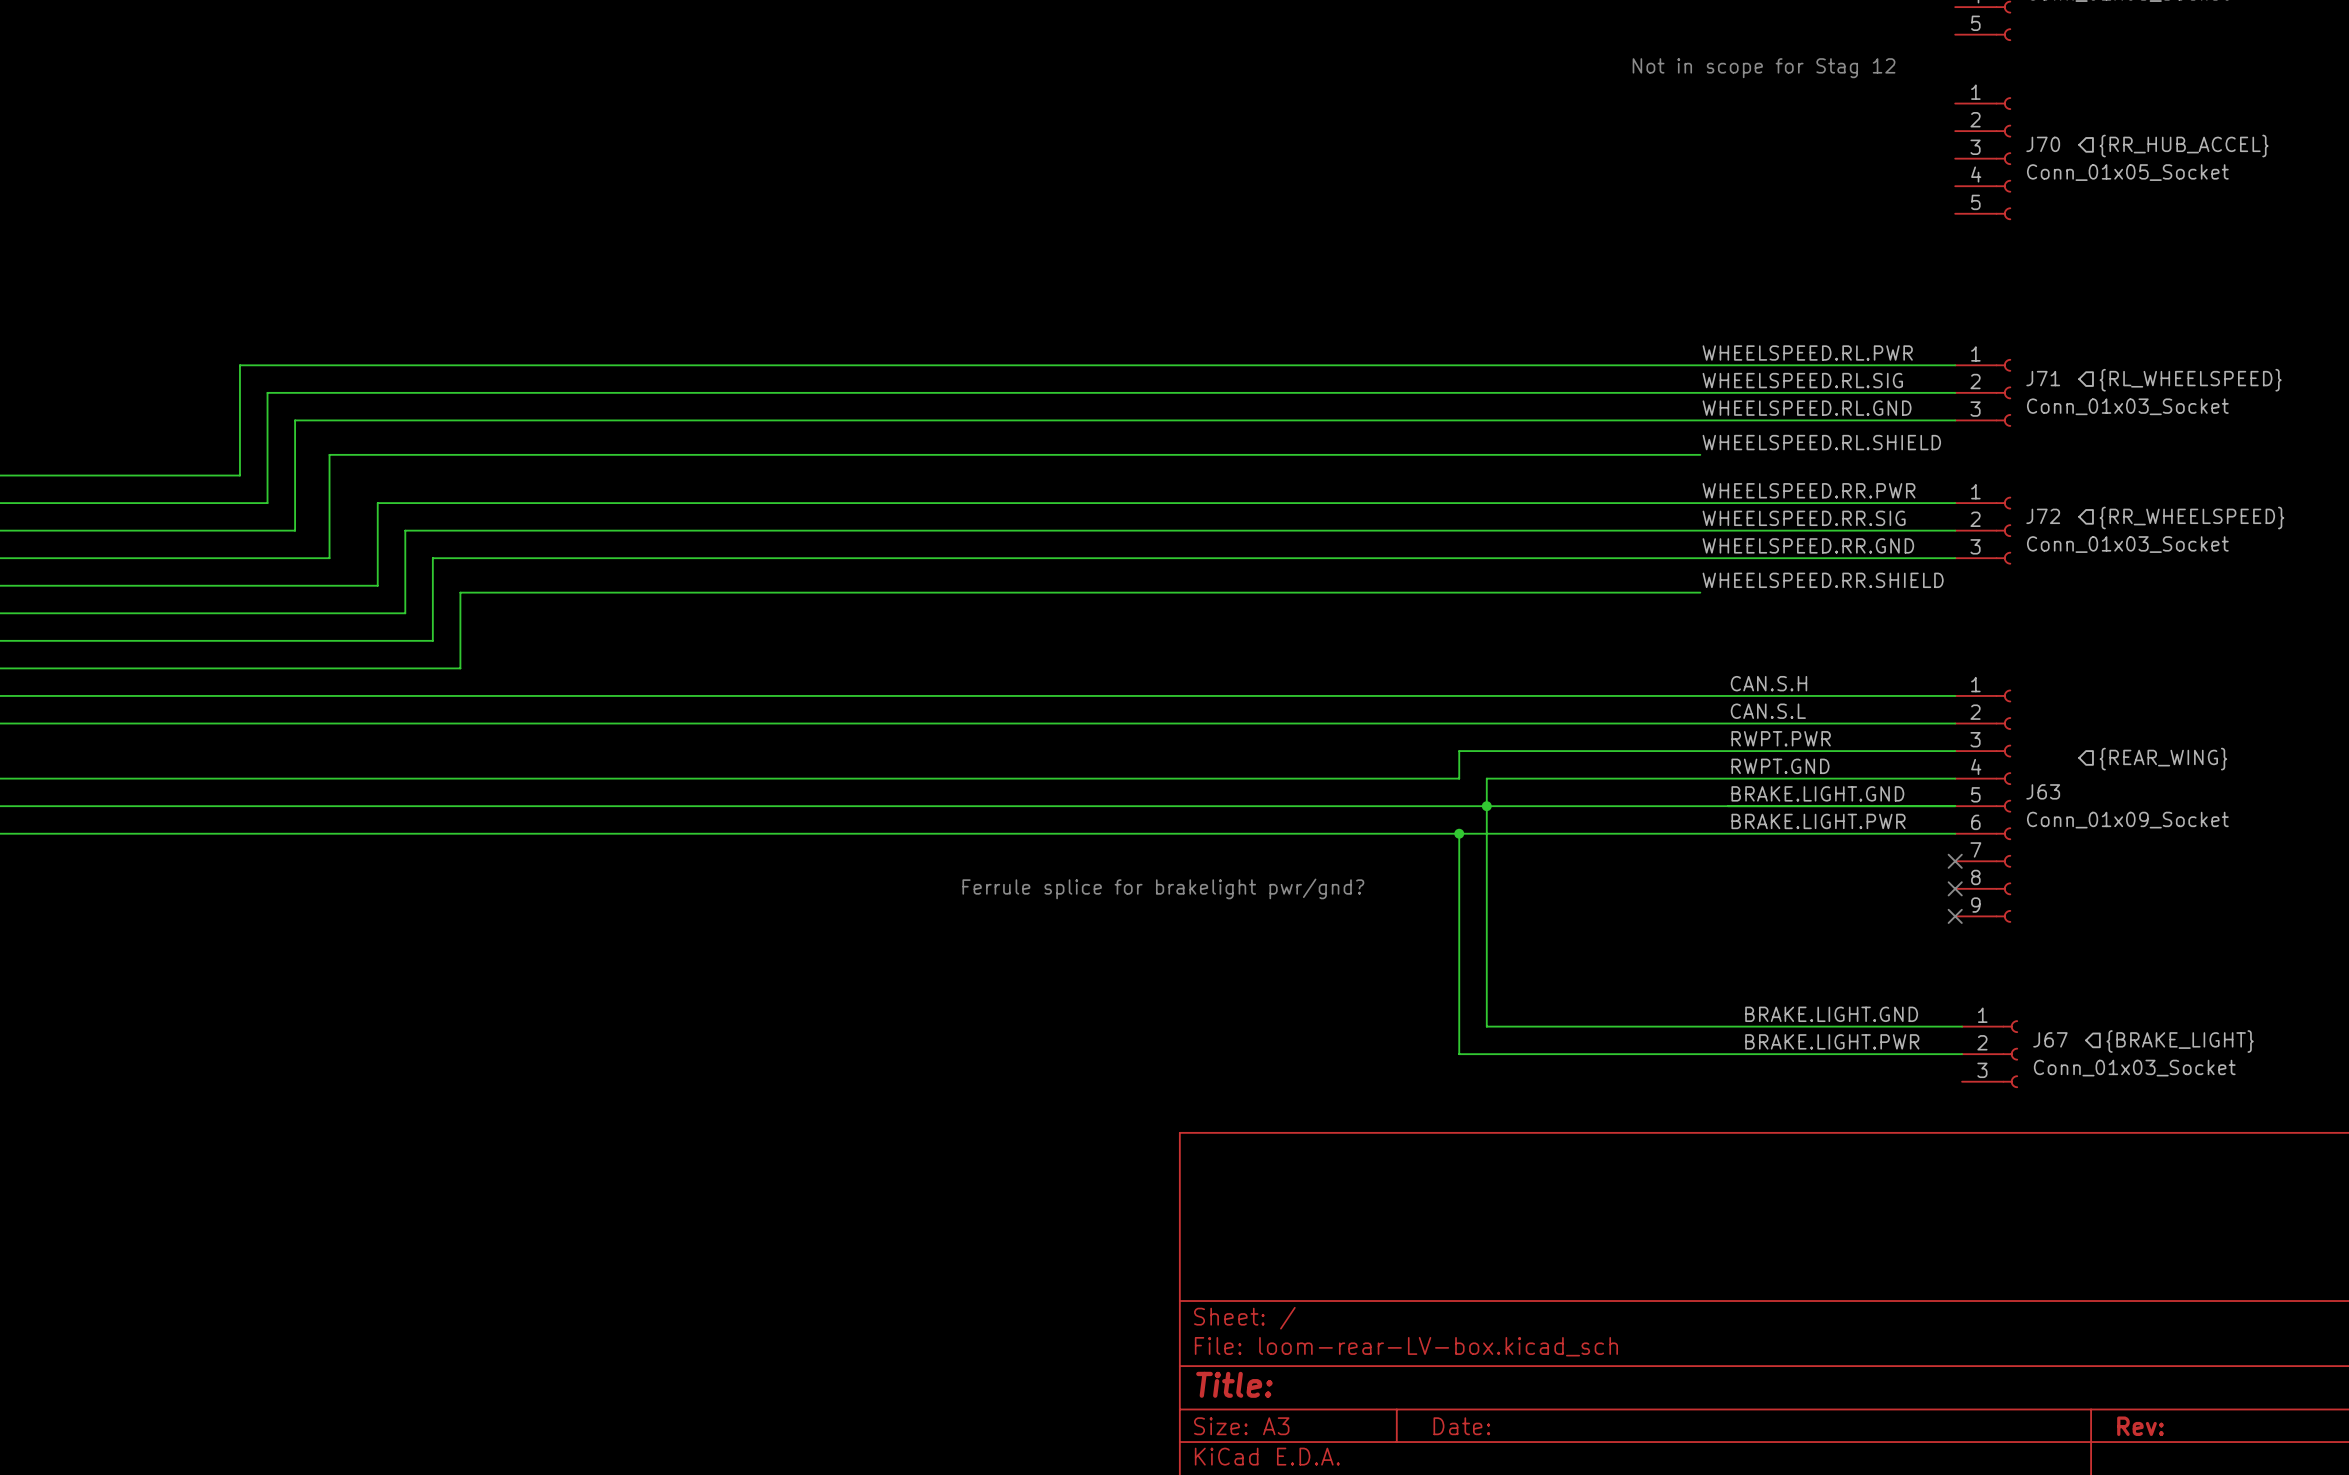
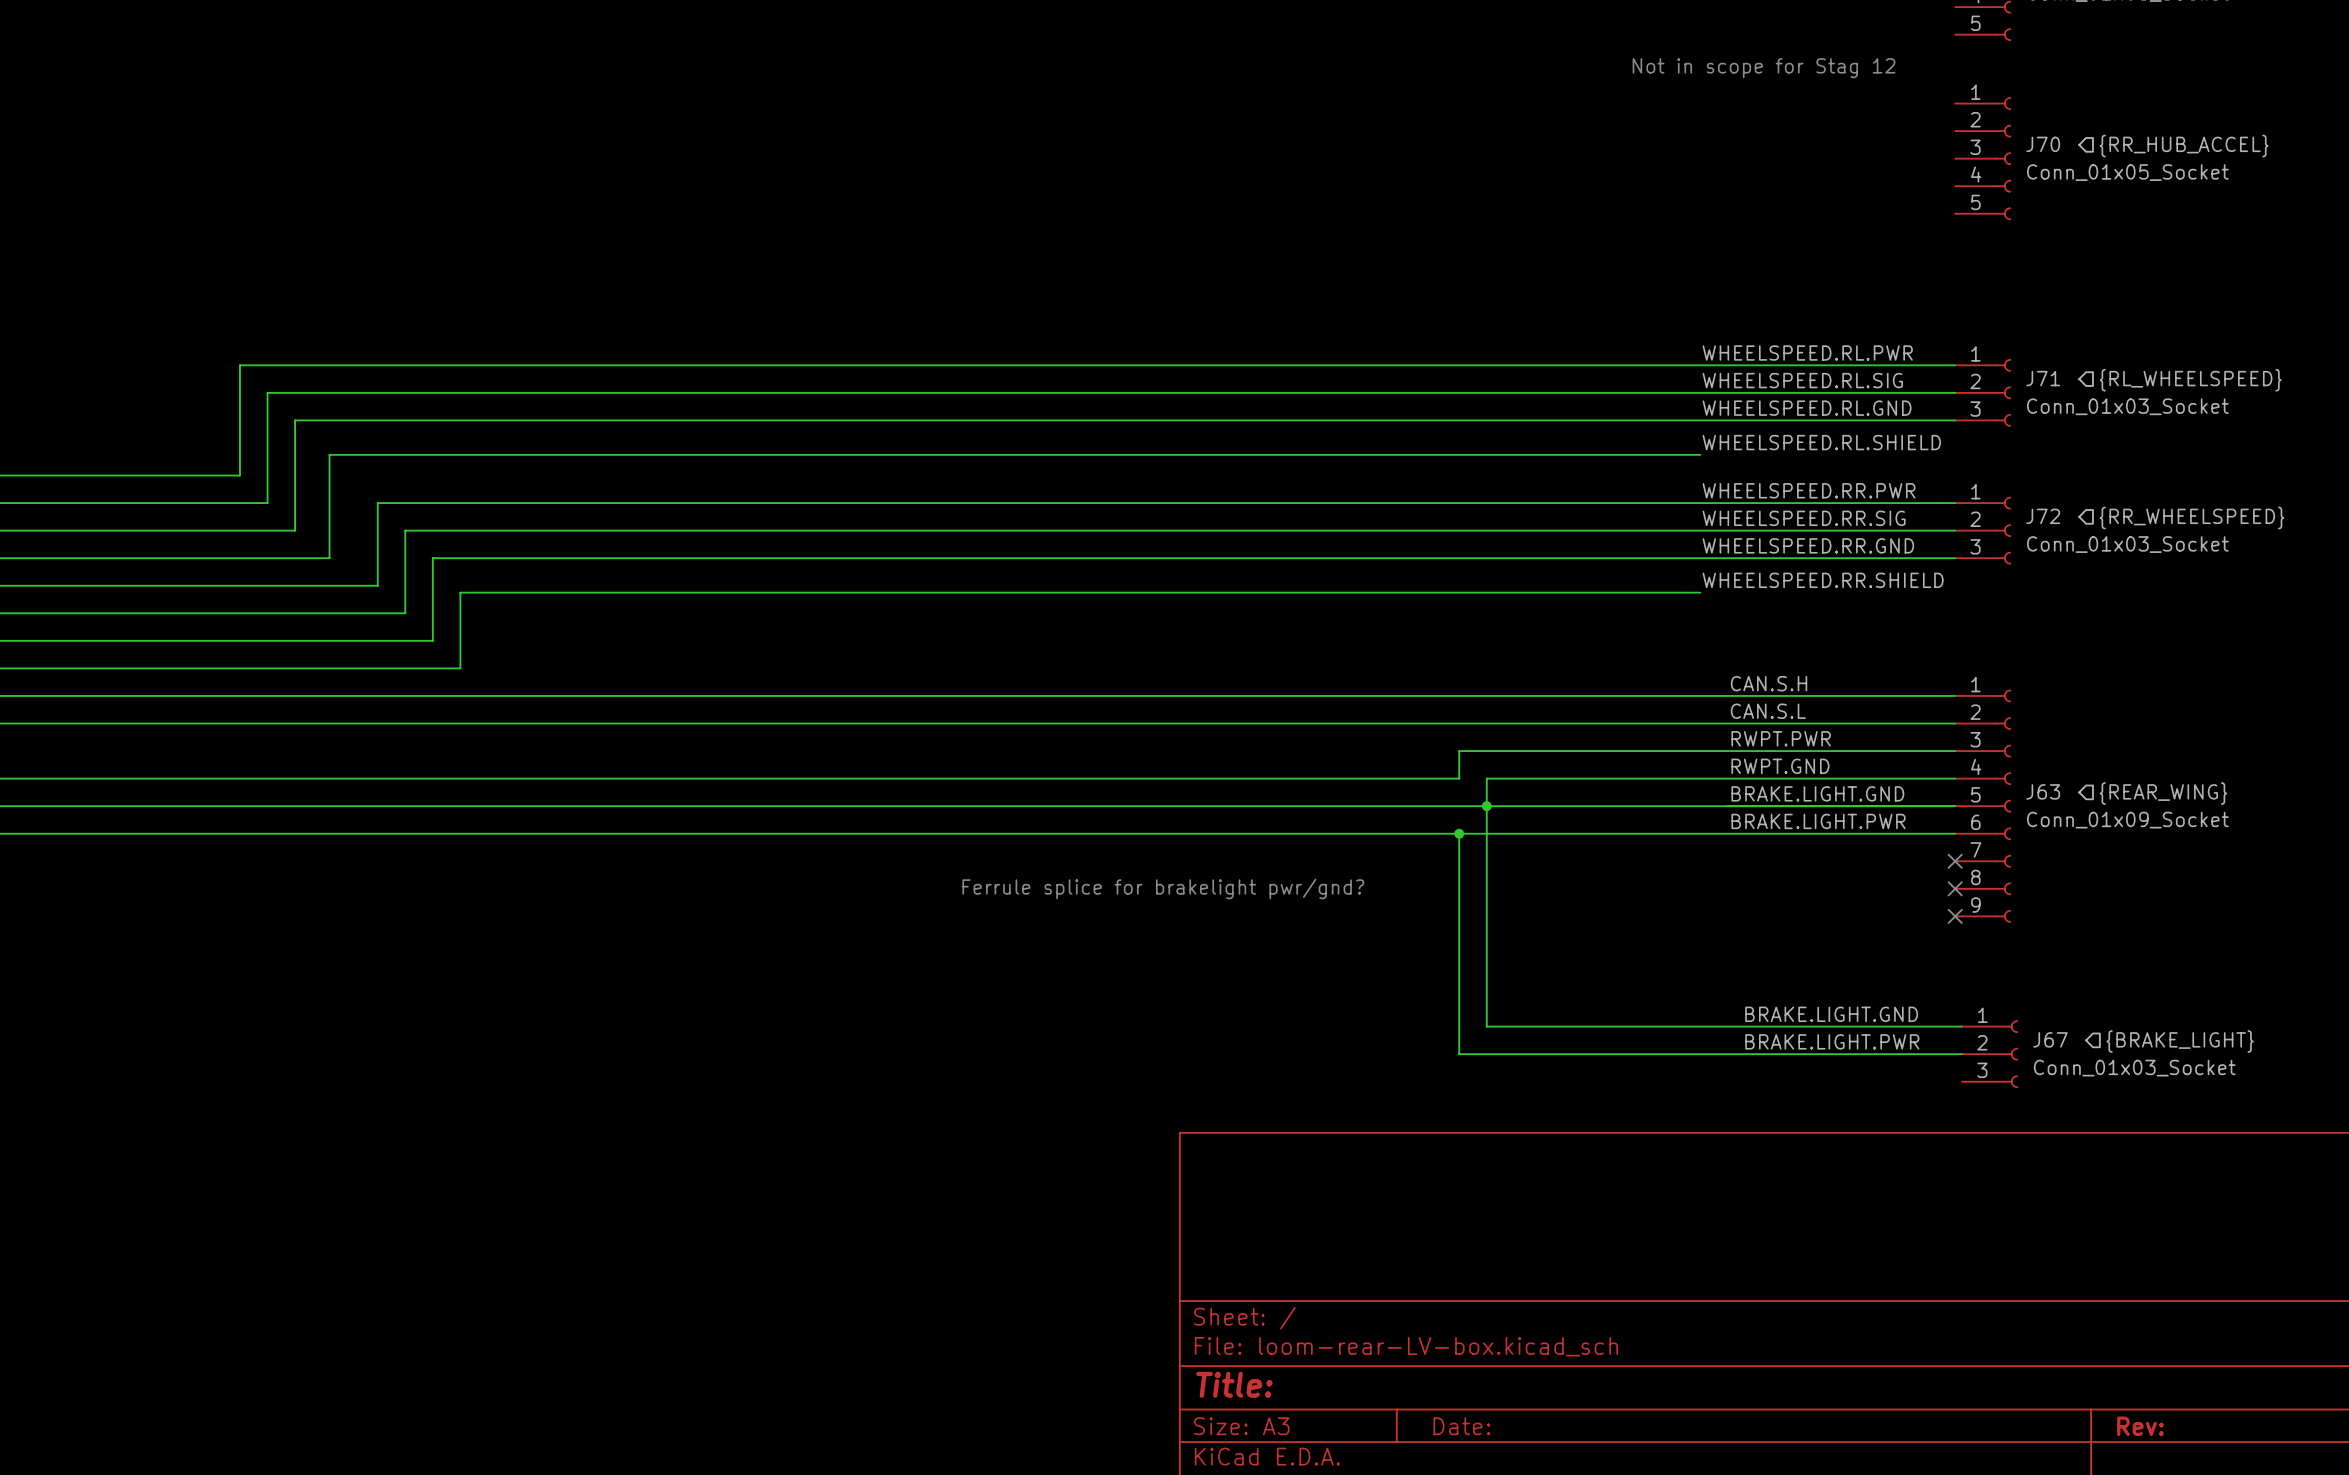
hierarchical label position: {REAR_WING} (2163, 759) -> {REAR_WING} (2163, 793)

